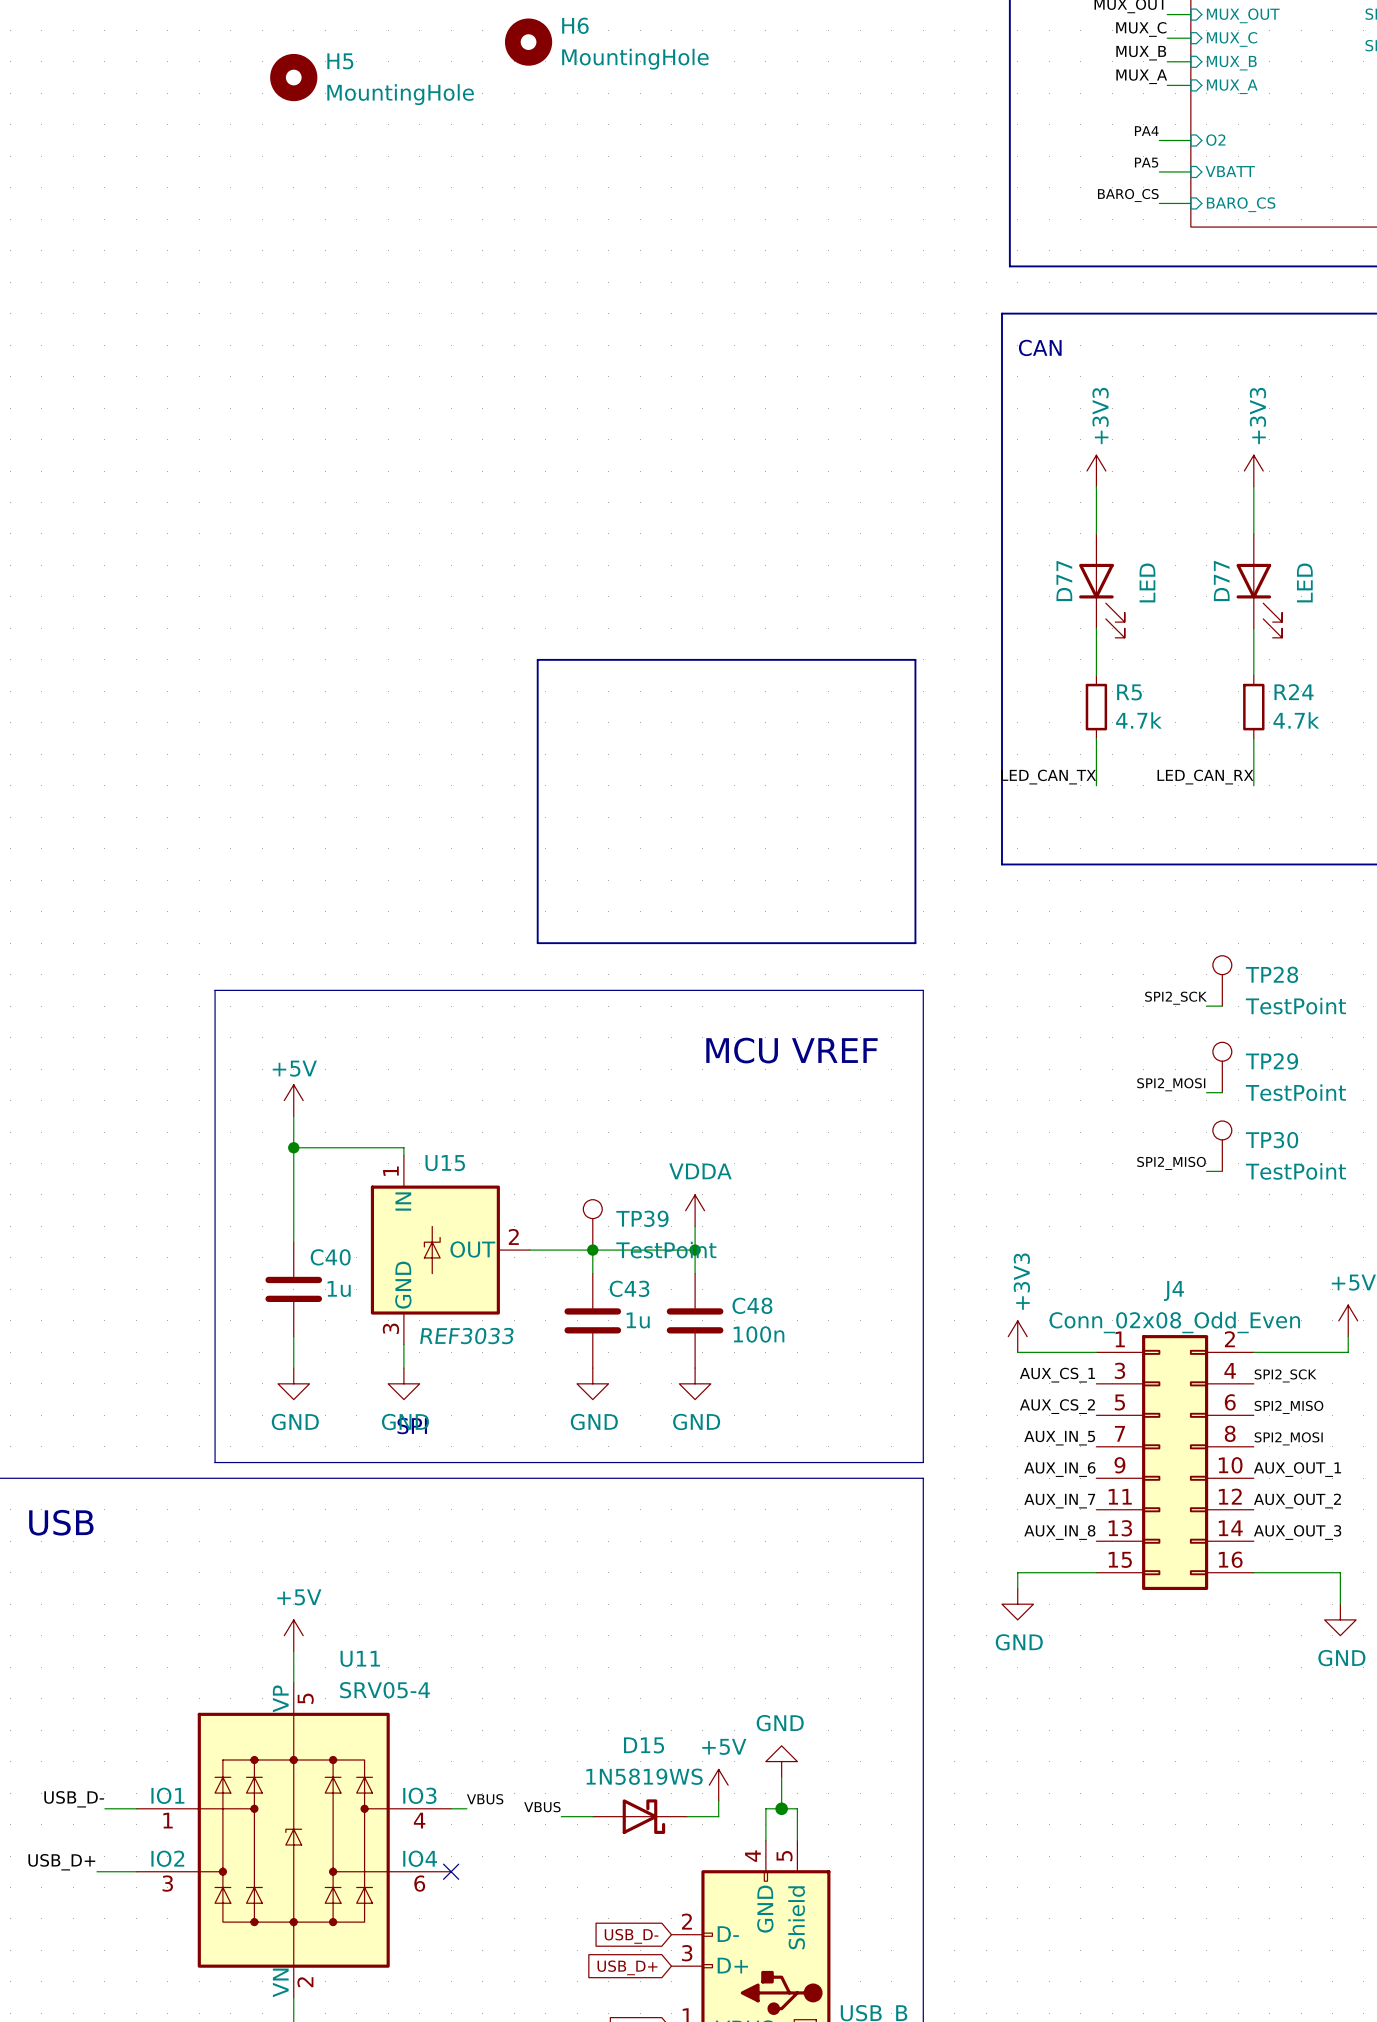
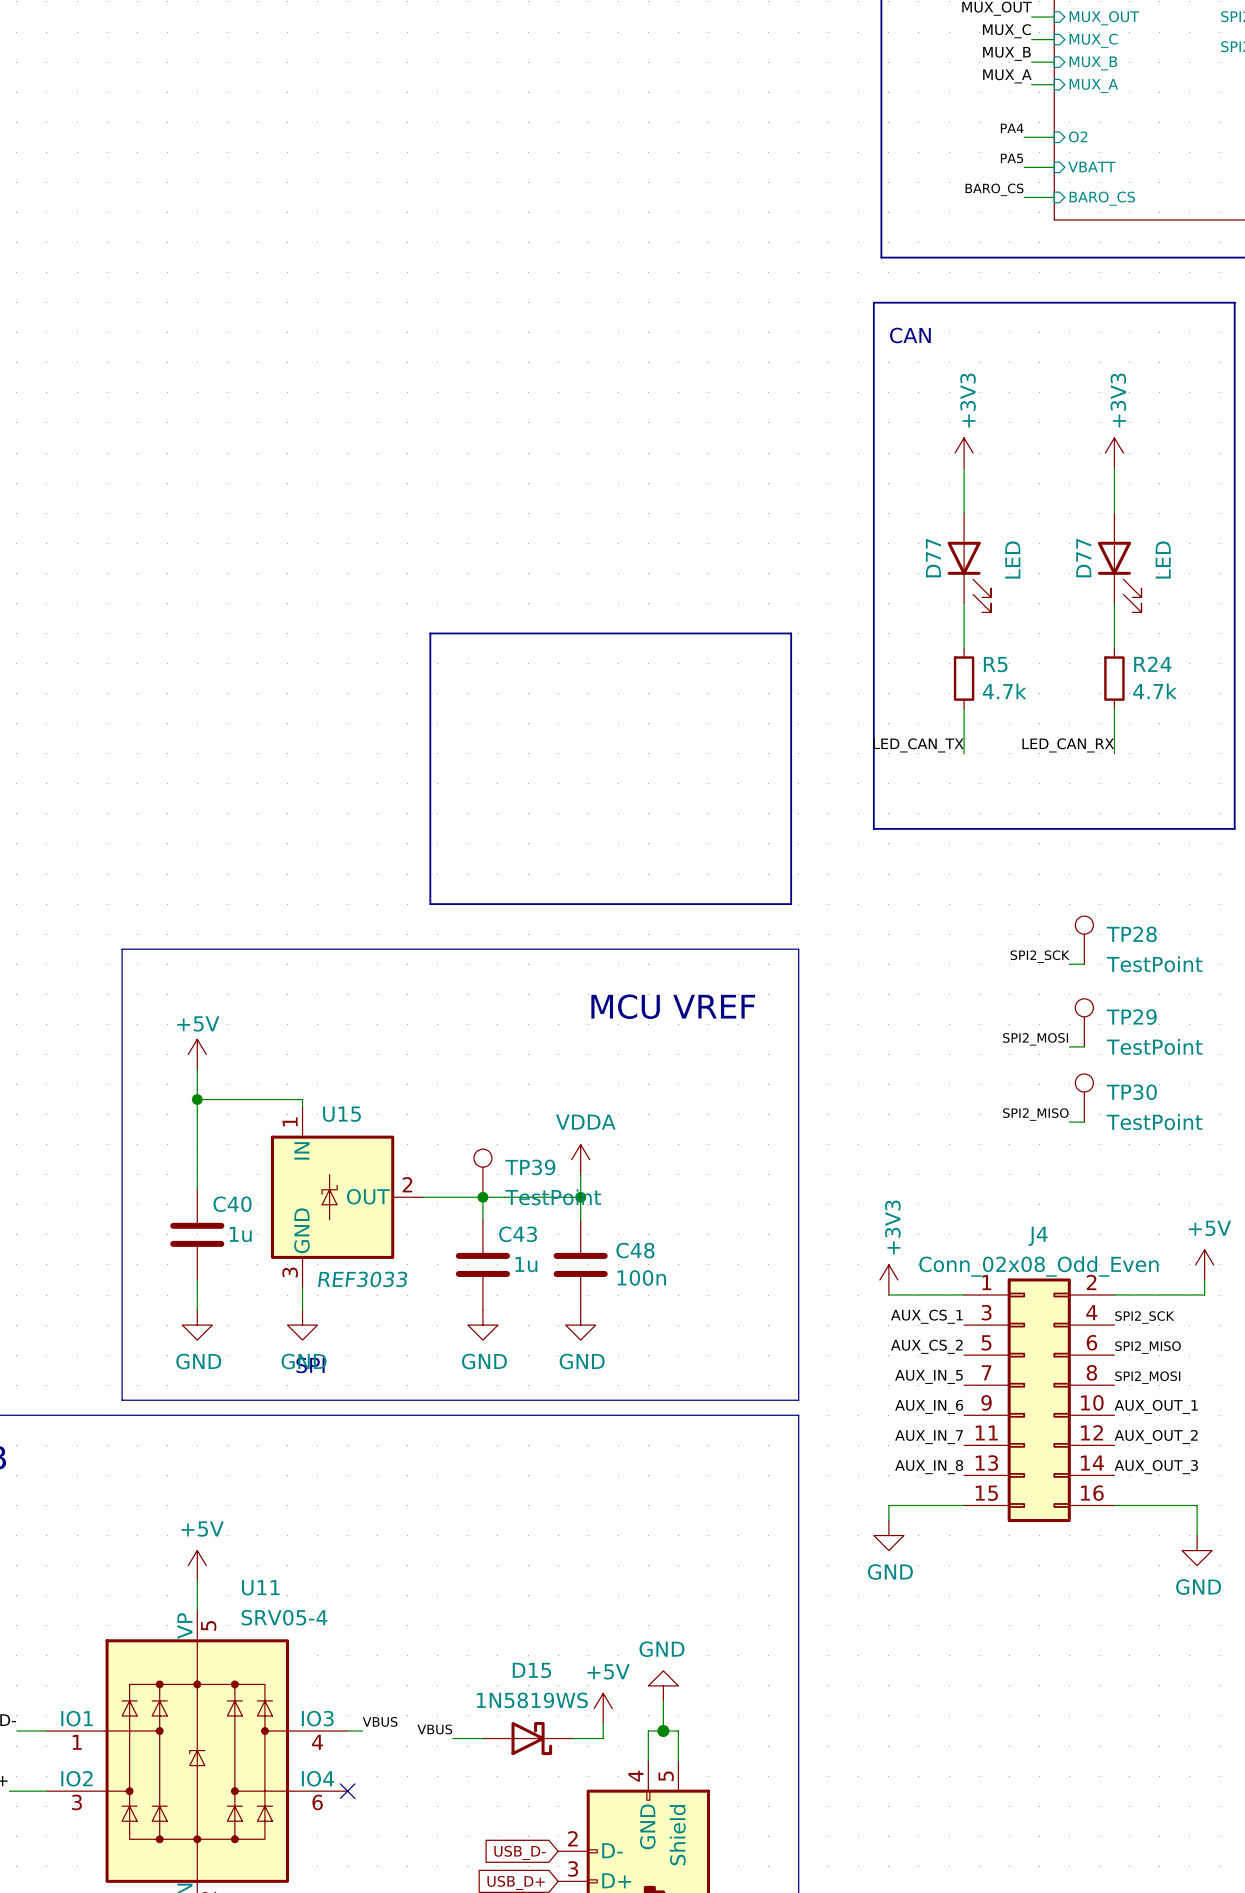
H6: MountingHole (528, 42) -> none
H5: MountingHole (293, 77) -> none

